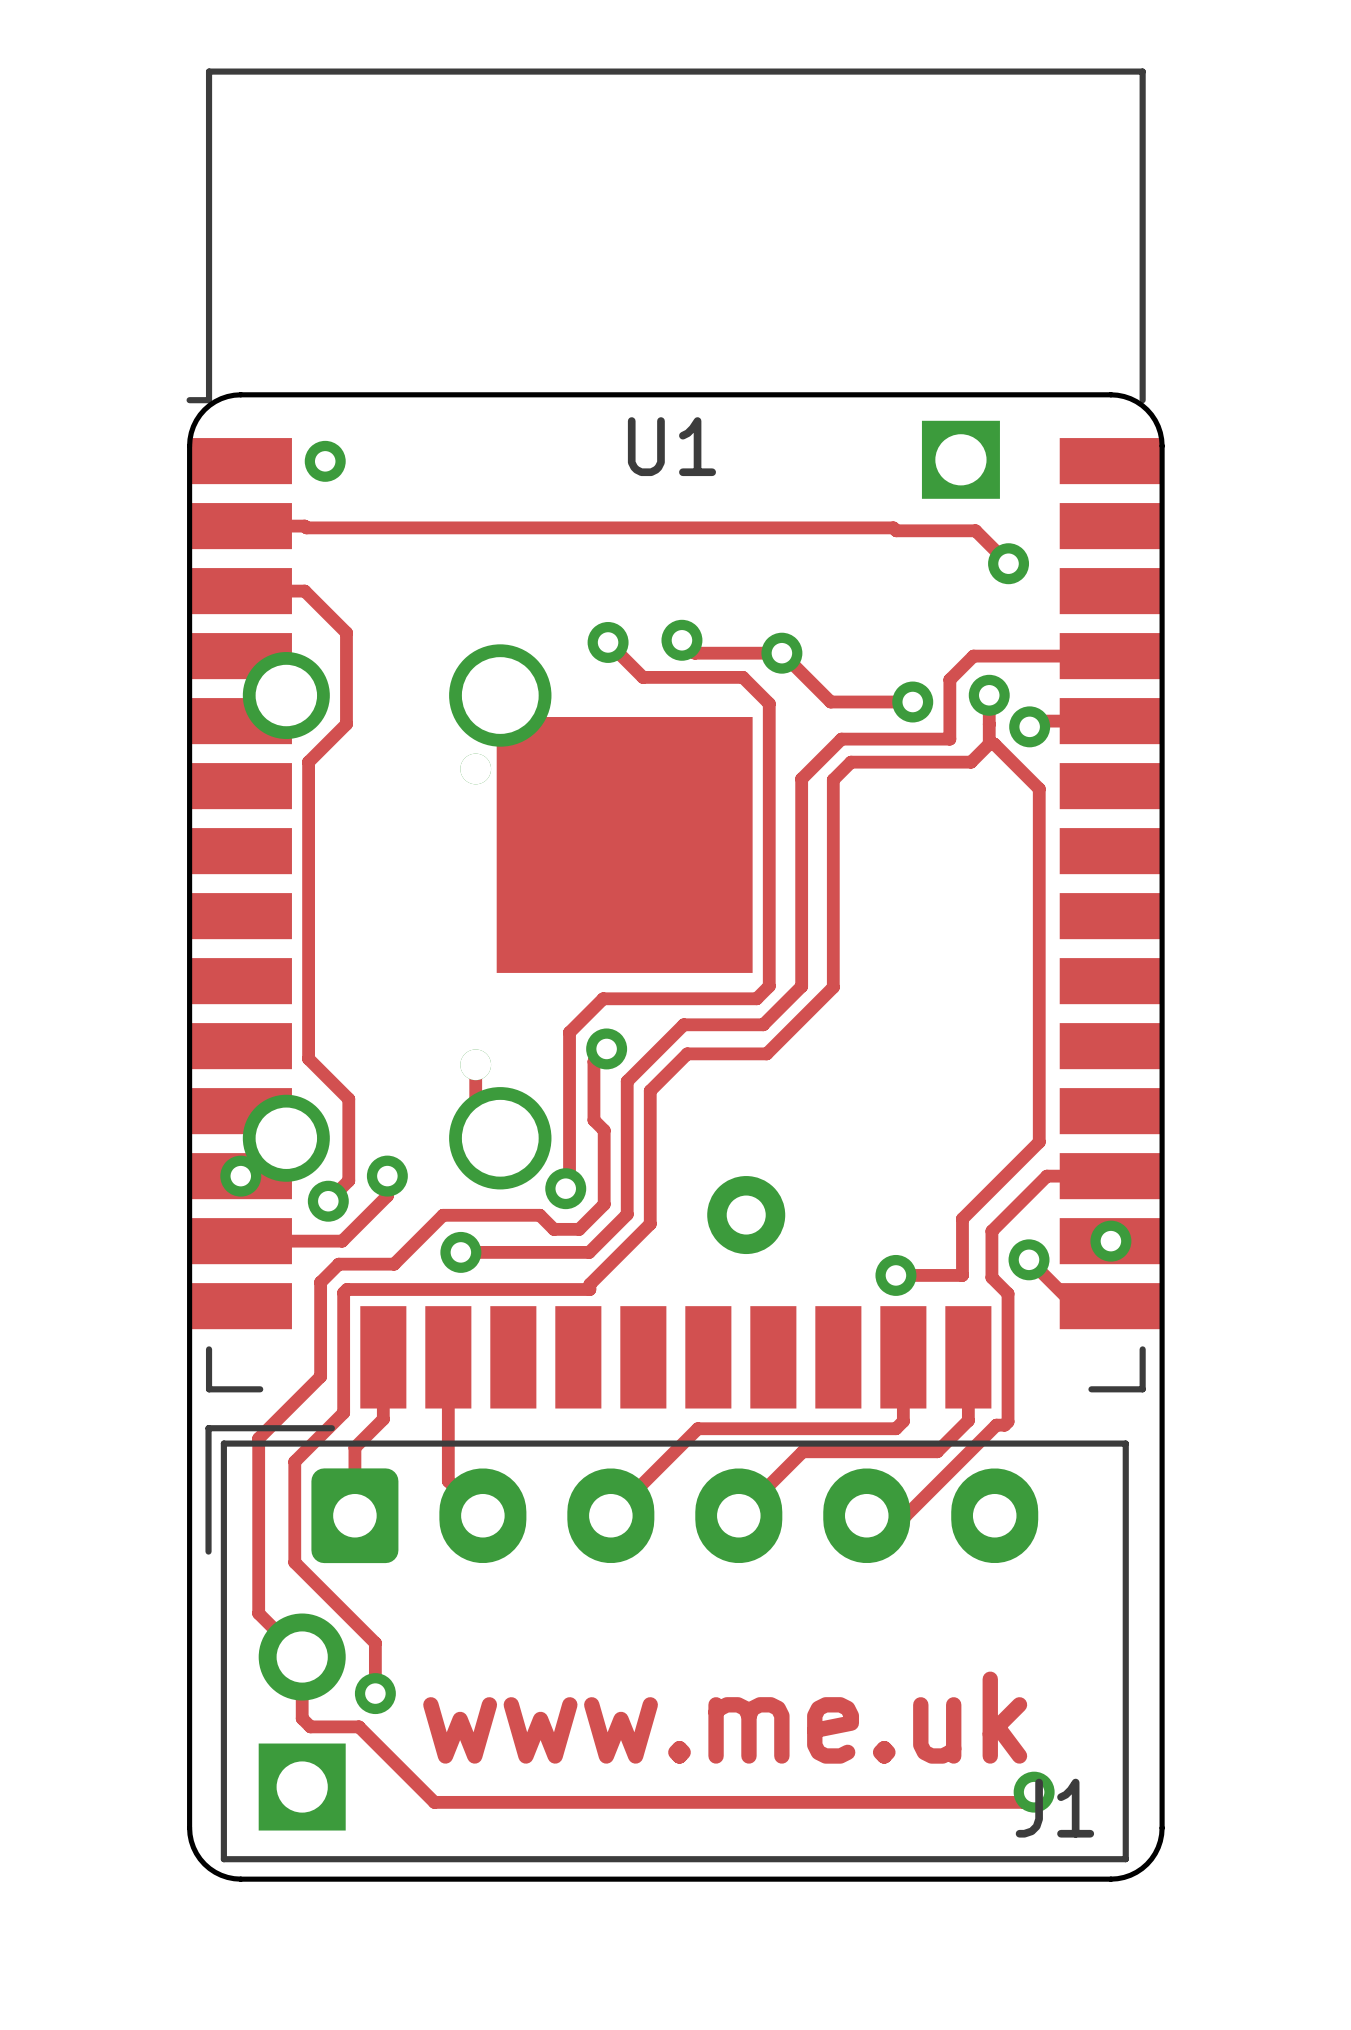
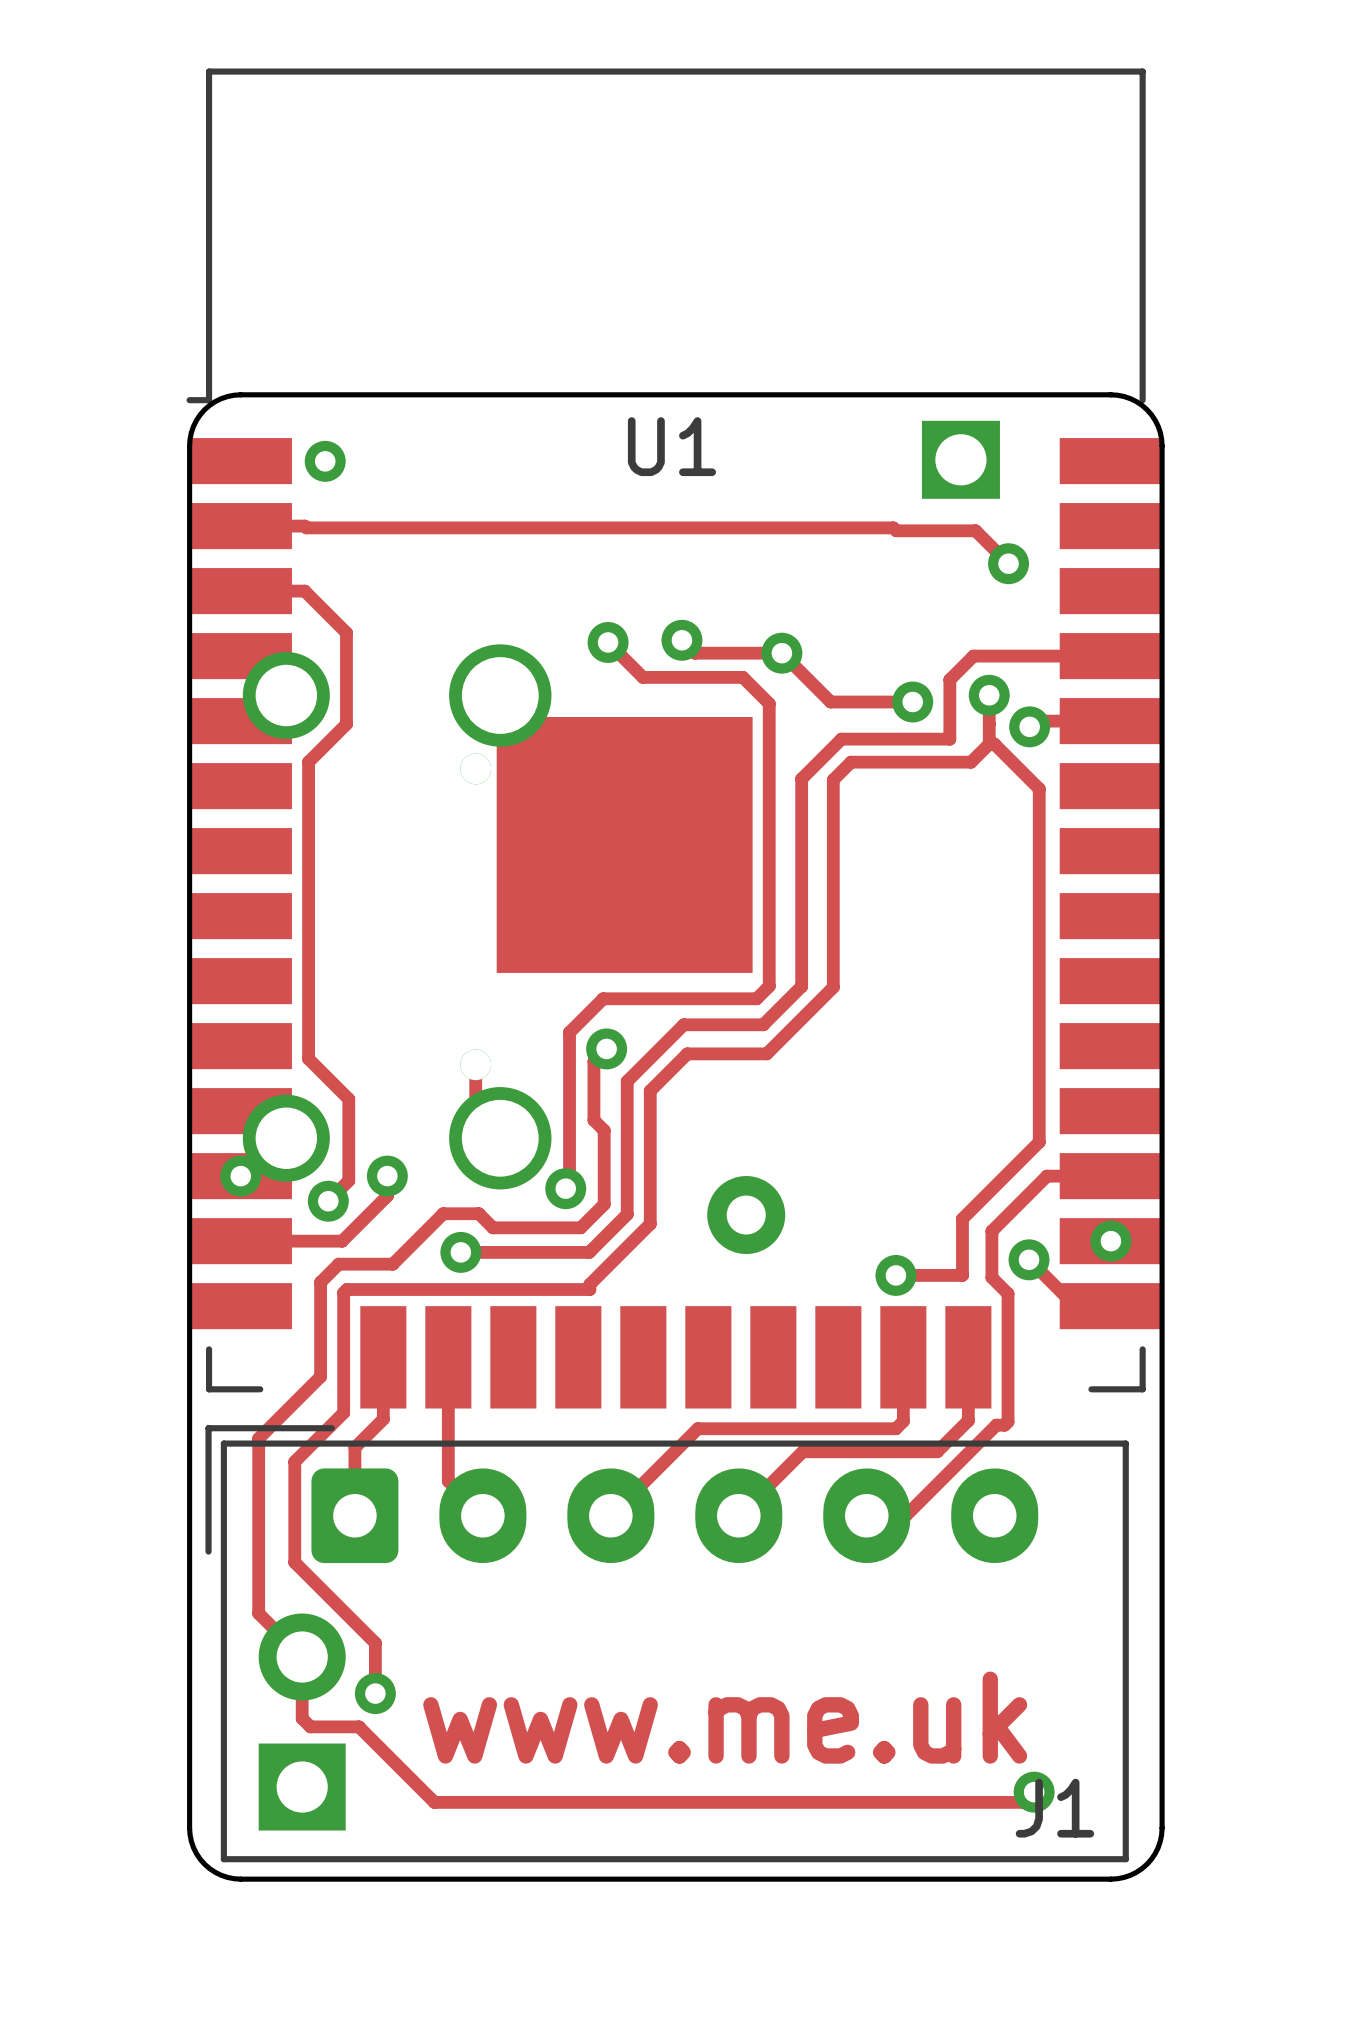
track: (604, 1204) (579, 1229) (553, 1229) (539, 1215) (443, 1215) (392, 1264) -> (604, 1204) (580, 1227) (492, 1227) (478, 1213) (443, 1213) (392, 1264)

